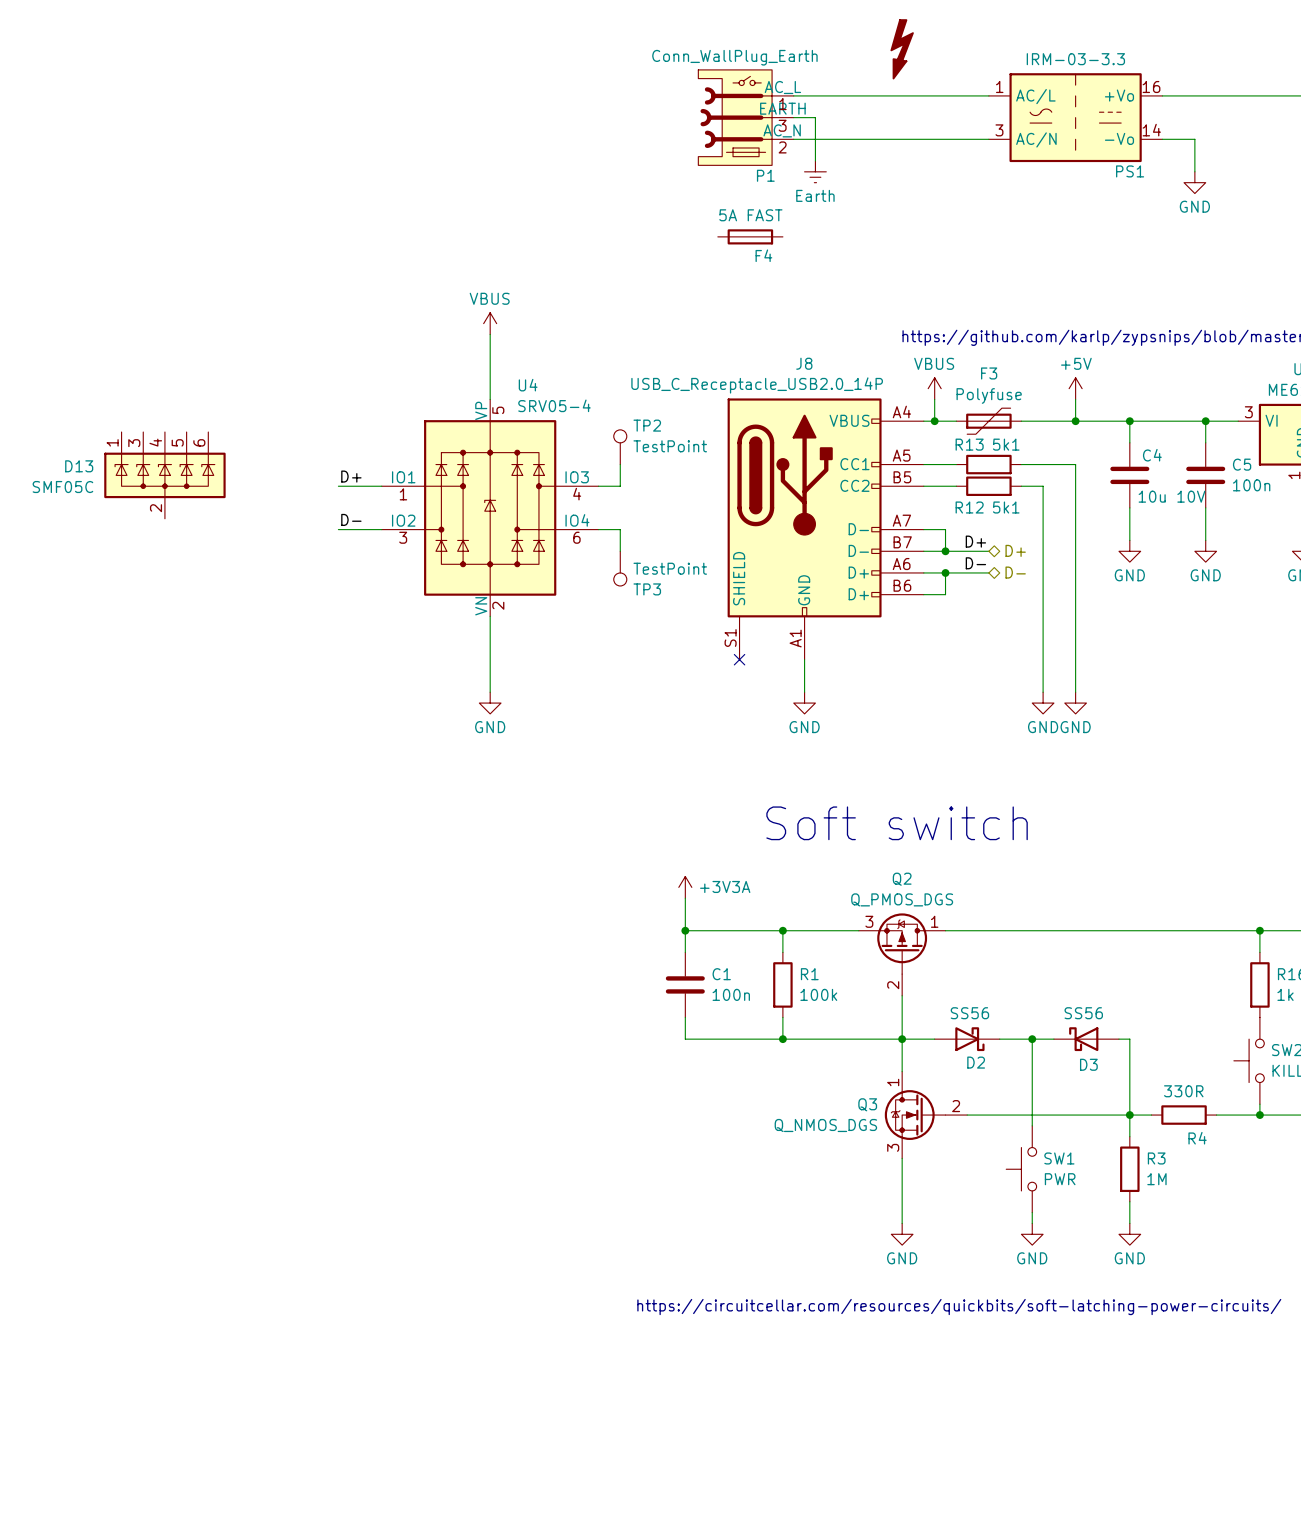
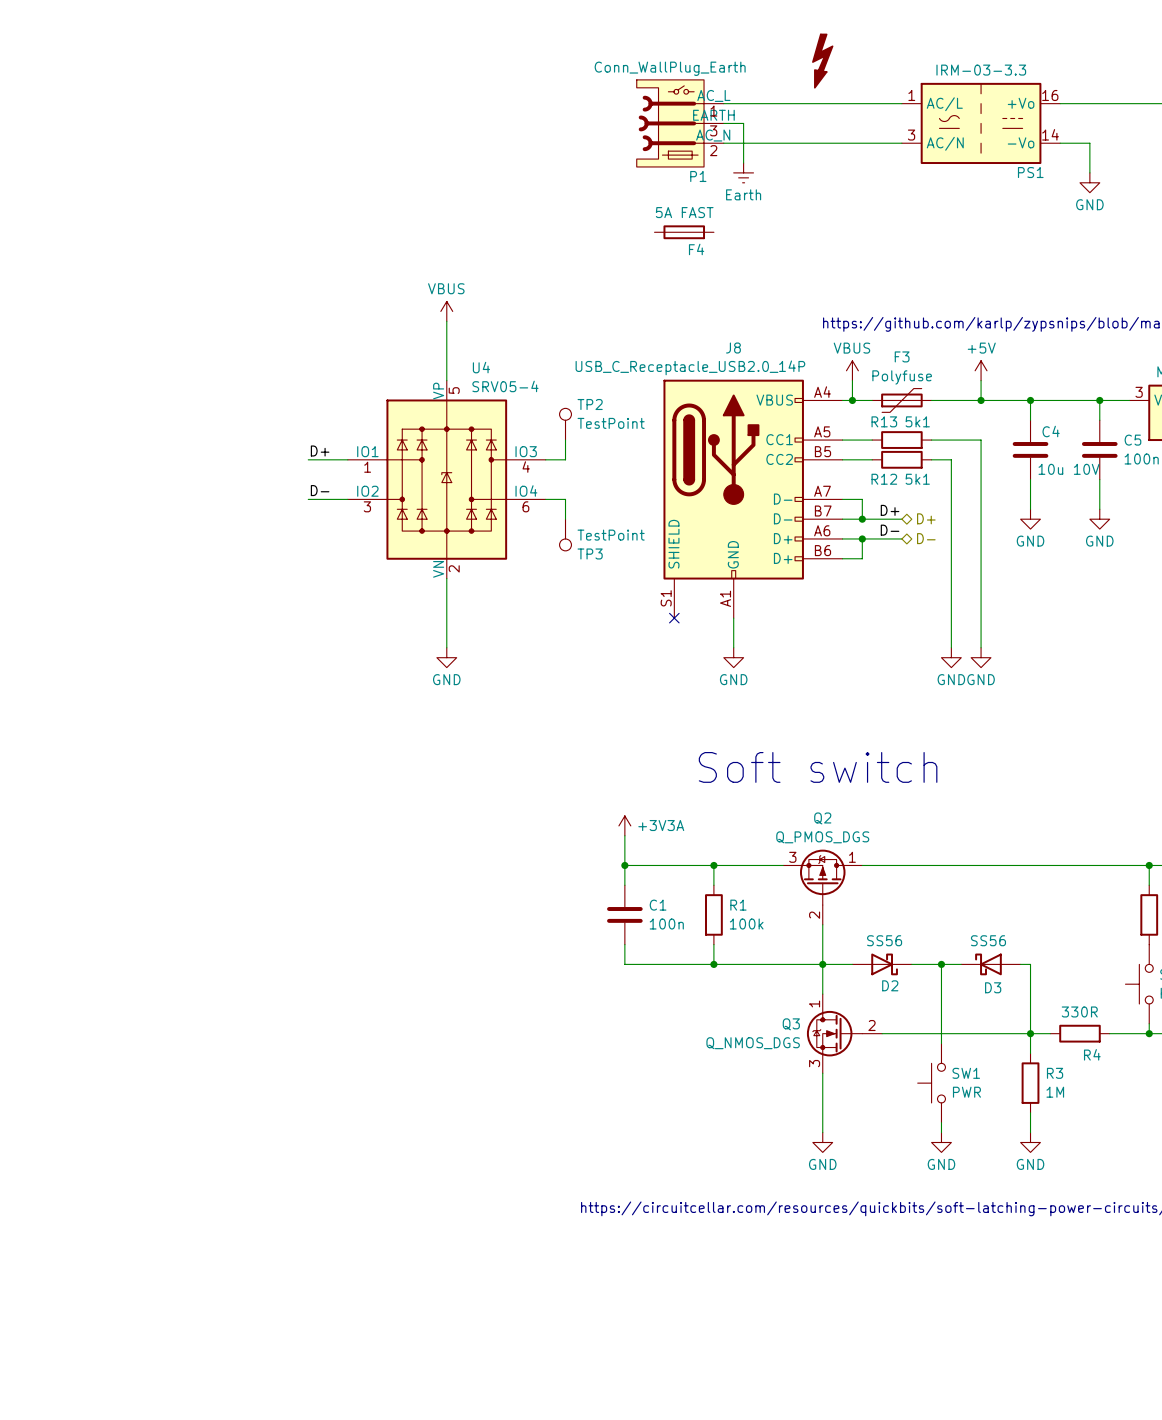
D13: SMF05C (164, 475) -> none

